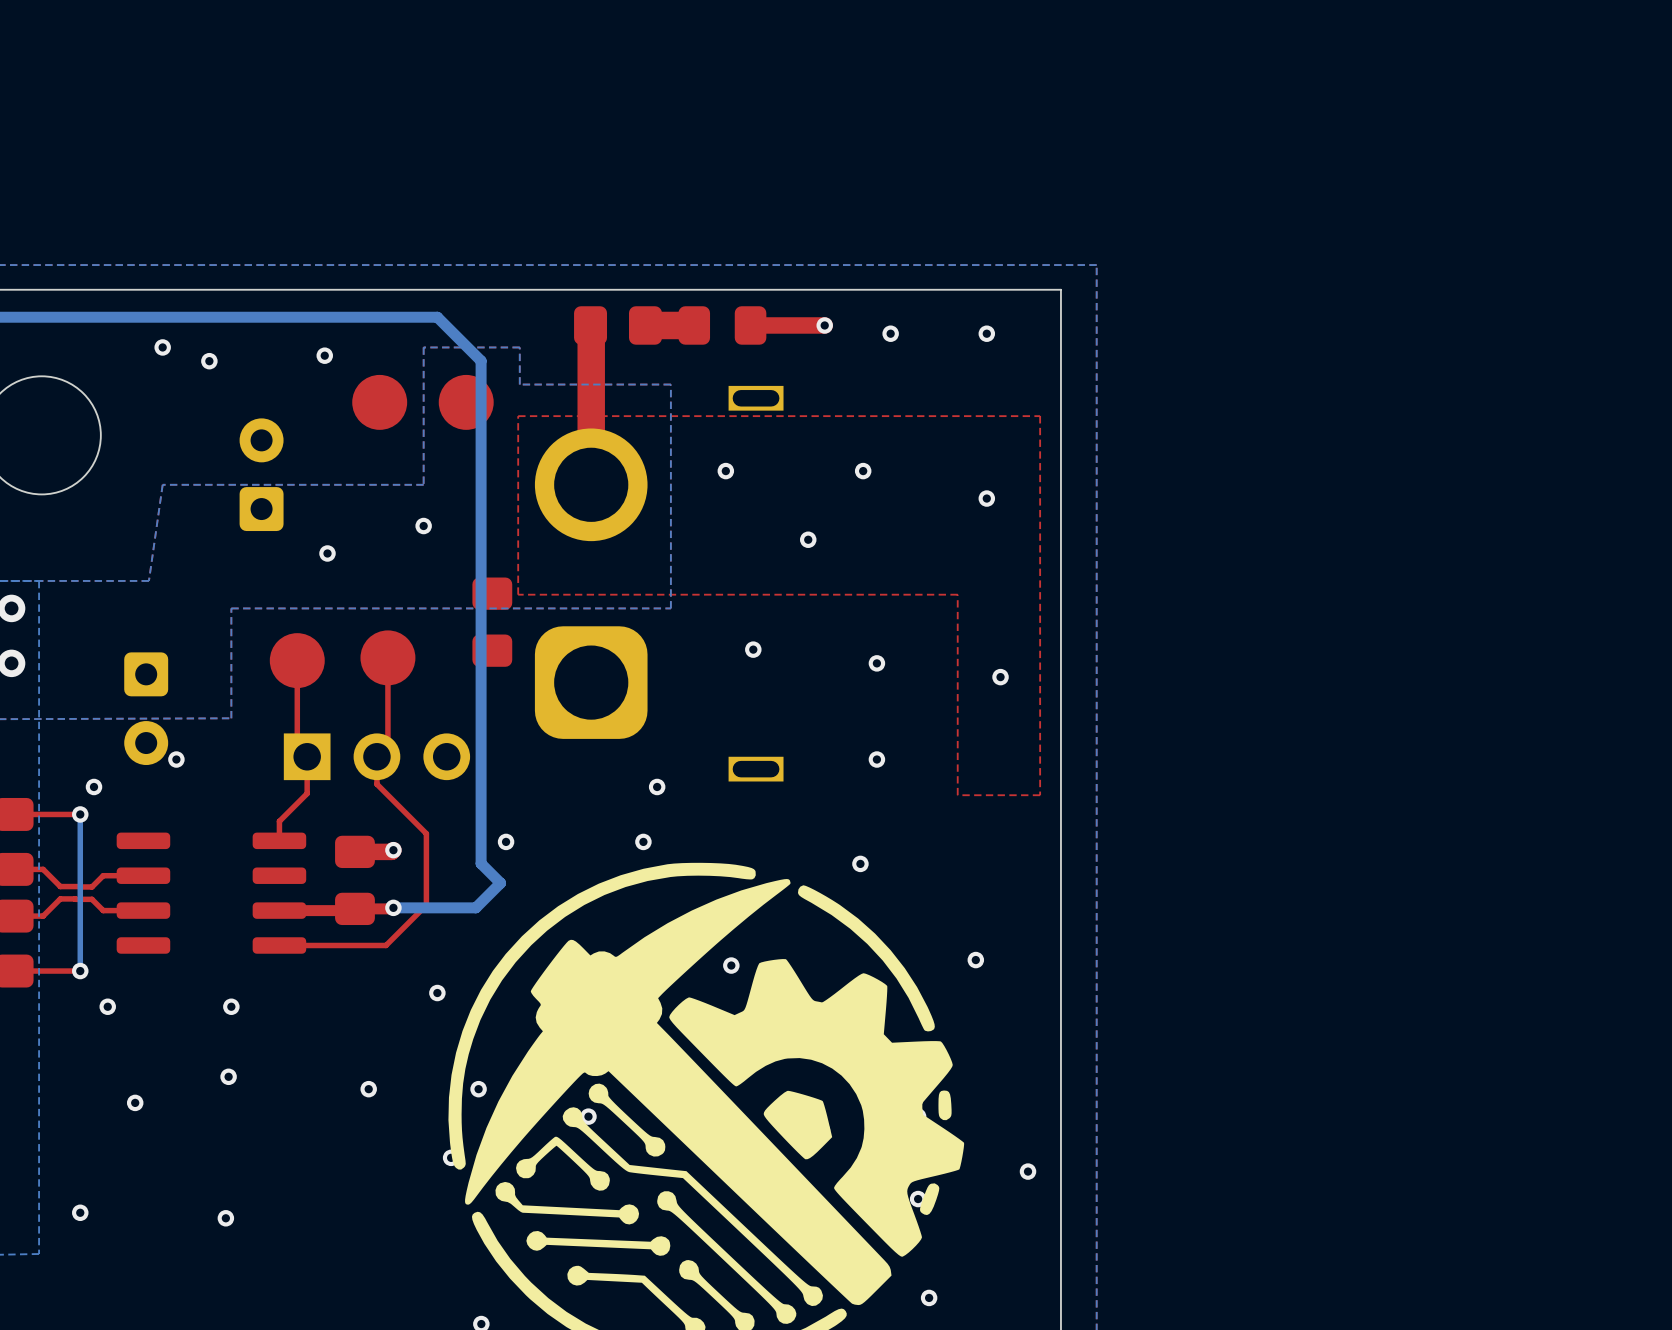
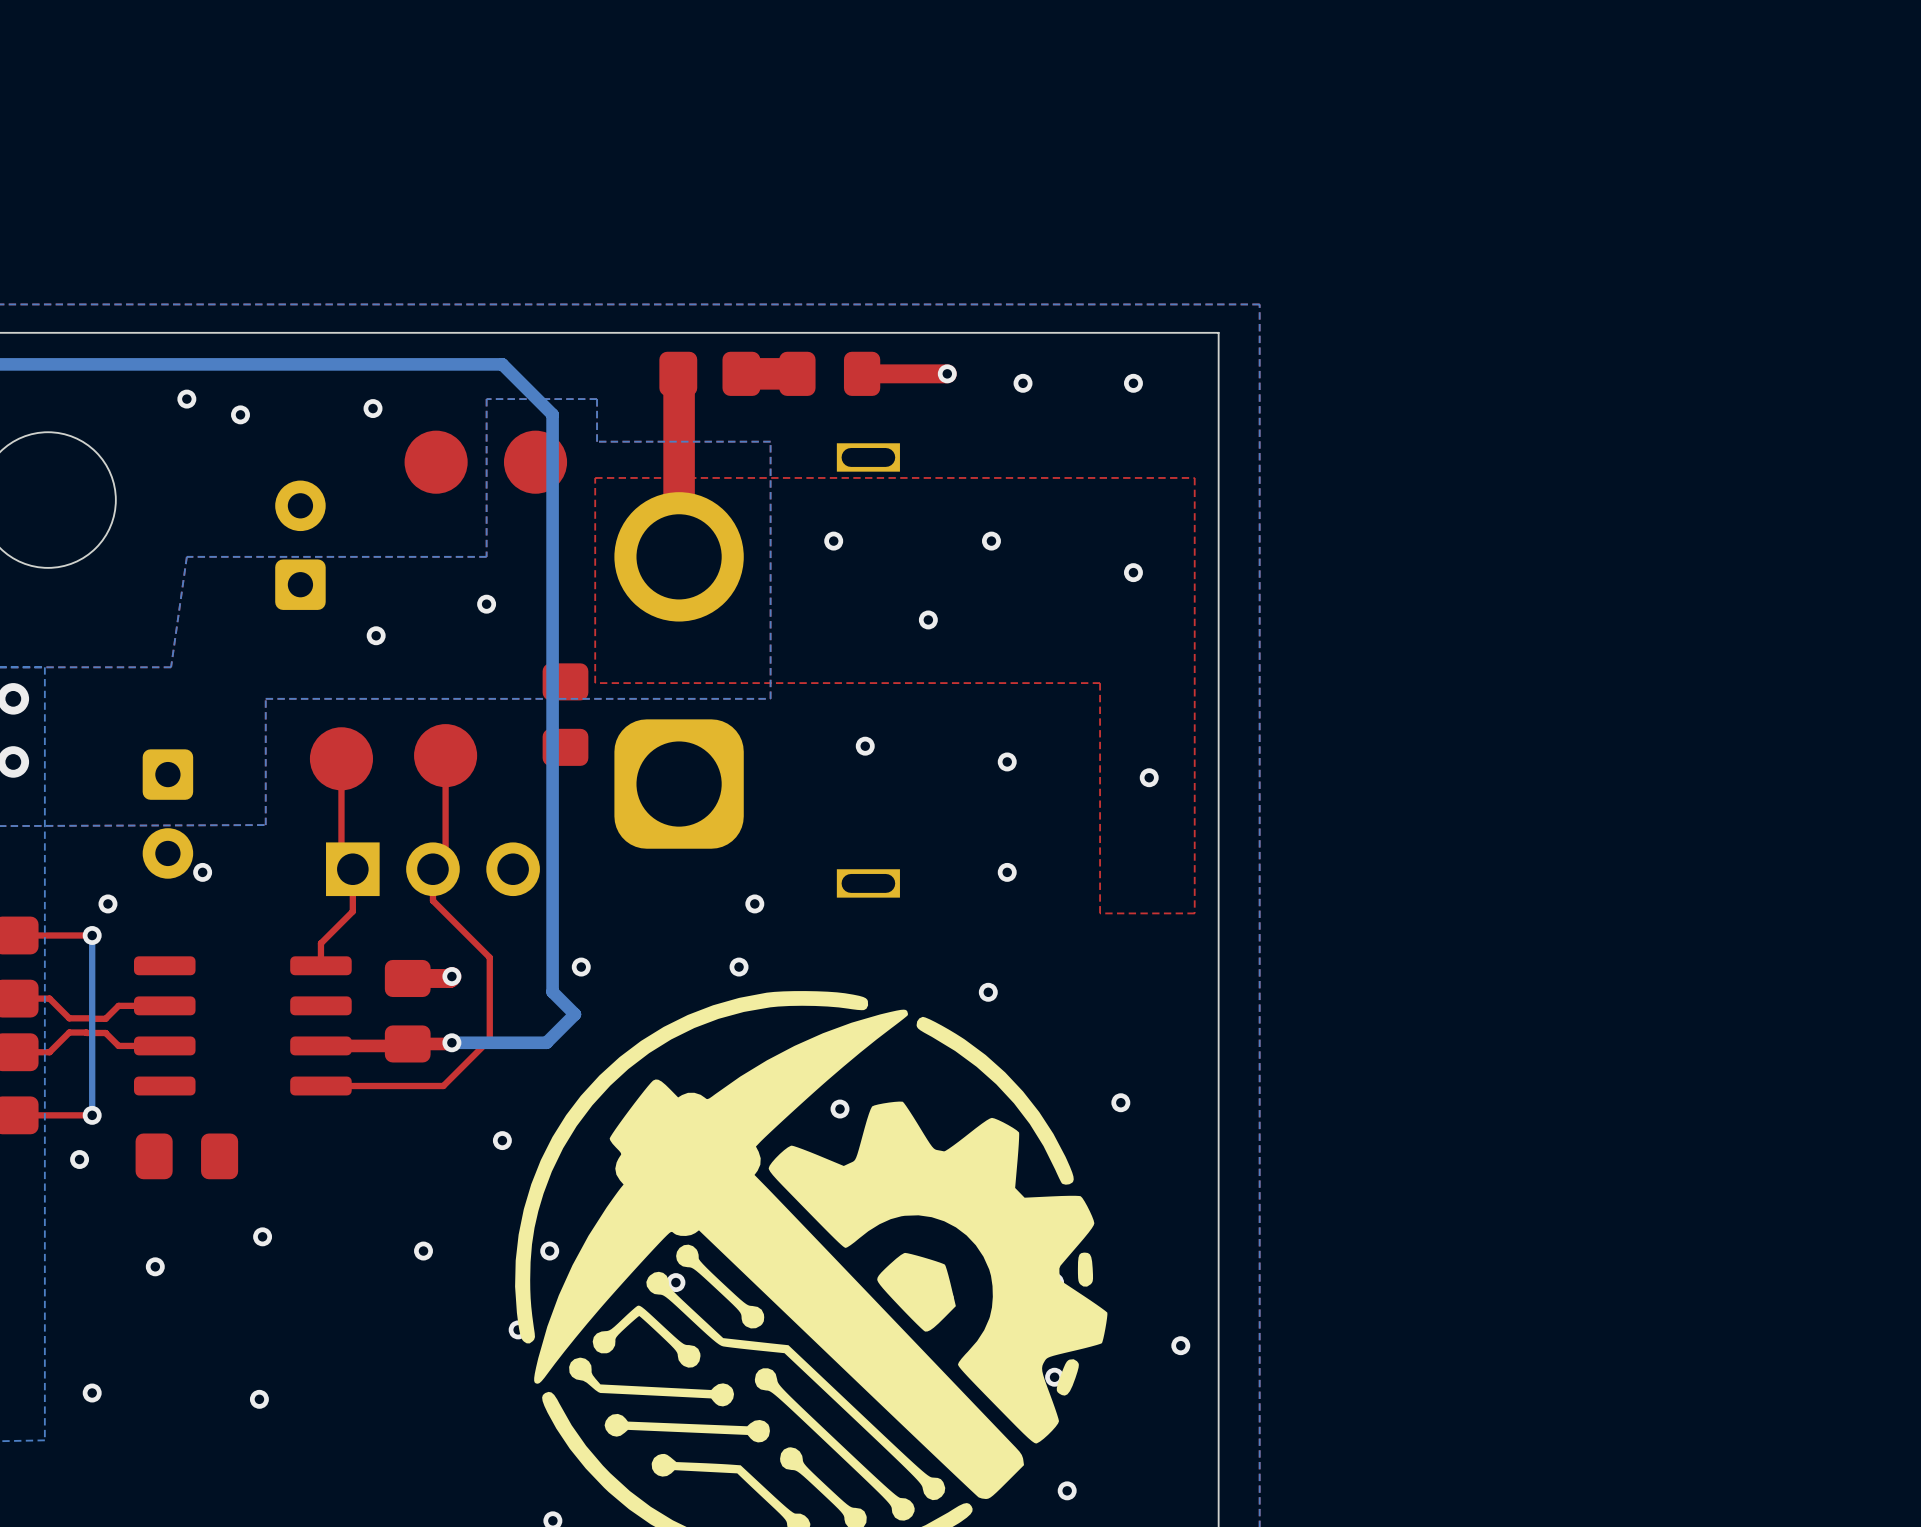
via position: (107, 1006) -> (79, 1159)
part: none -> (186, 1156)
via: (231, 1006) -> none

